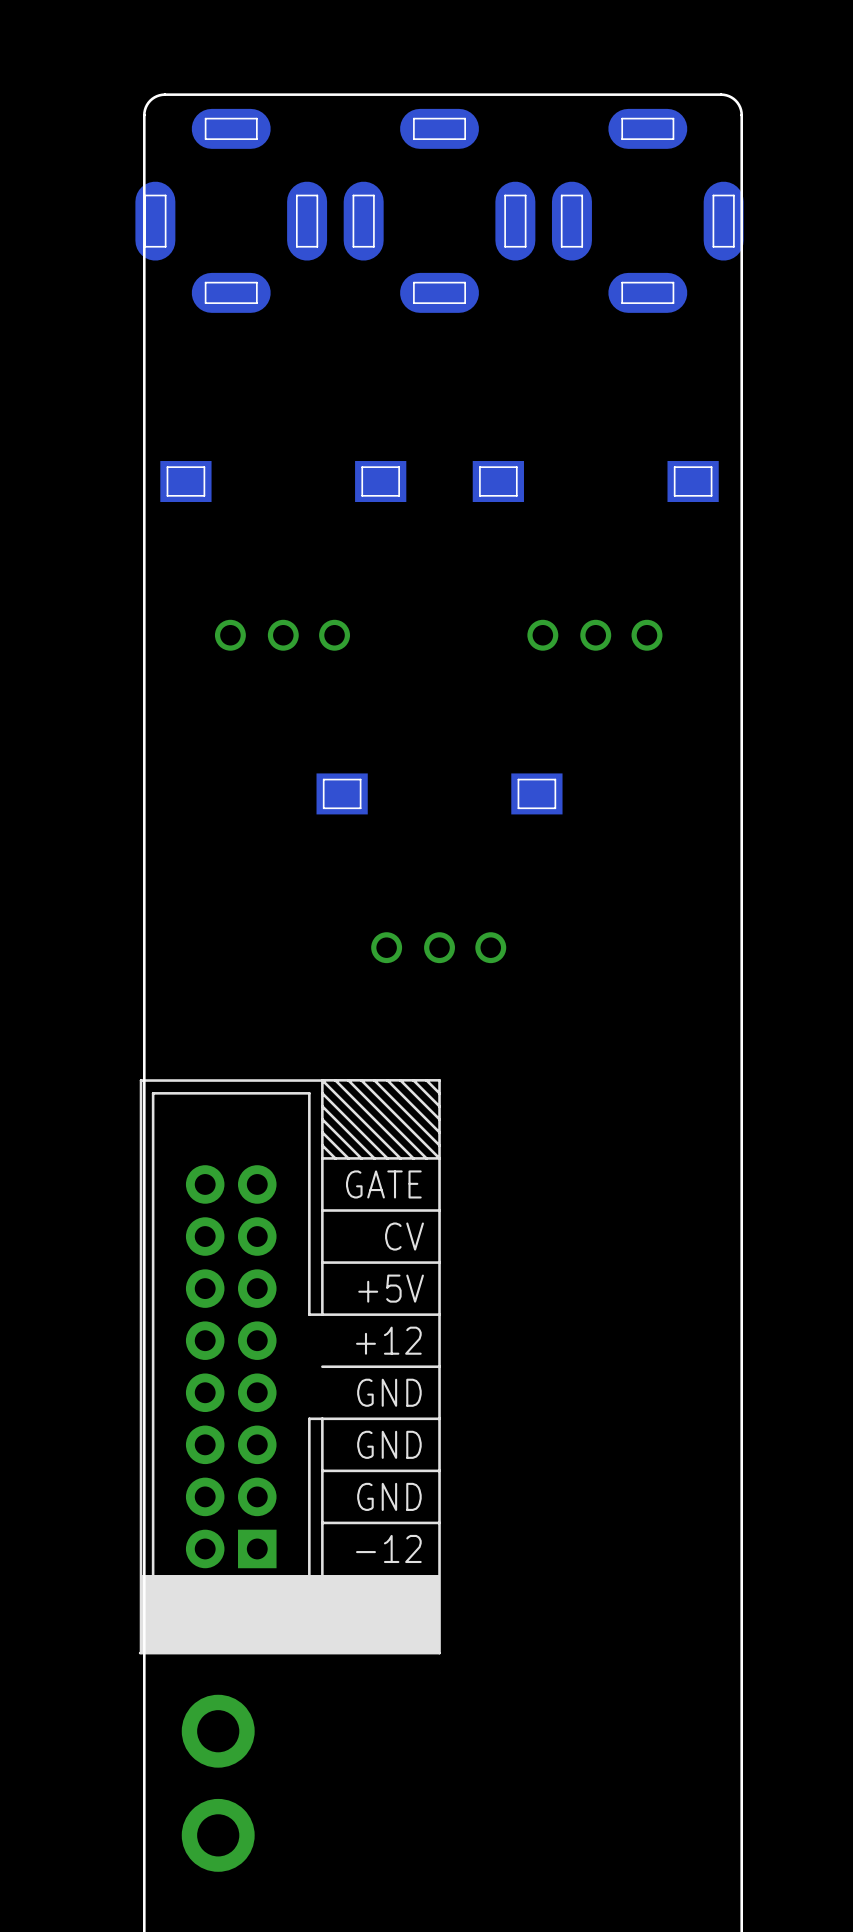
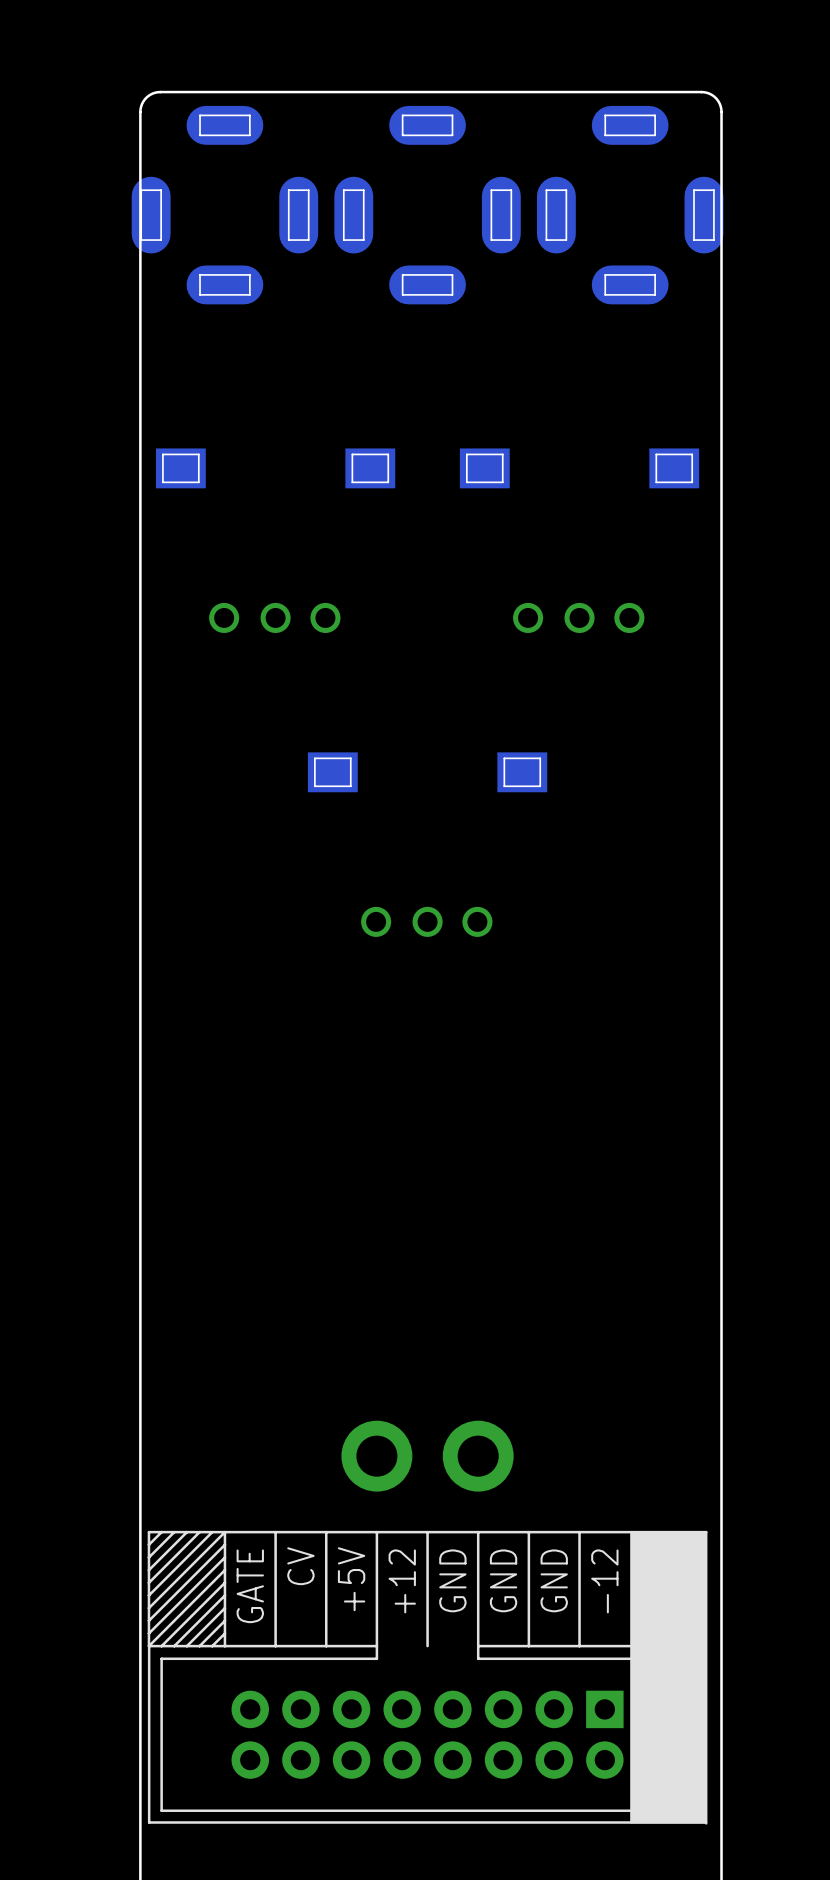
part rotation: 0° (289, 1366) -> 90° counterclockwise (427, 1677)
part position: (289, 1366) -> (427, 1677)
part rotation: 0° (218, 1783) -> 90° clockwise (427, 1456)
part position: (218, 1783) -> (427, 1456)

